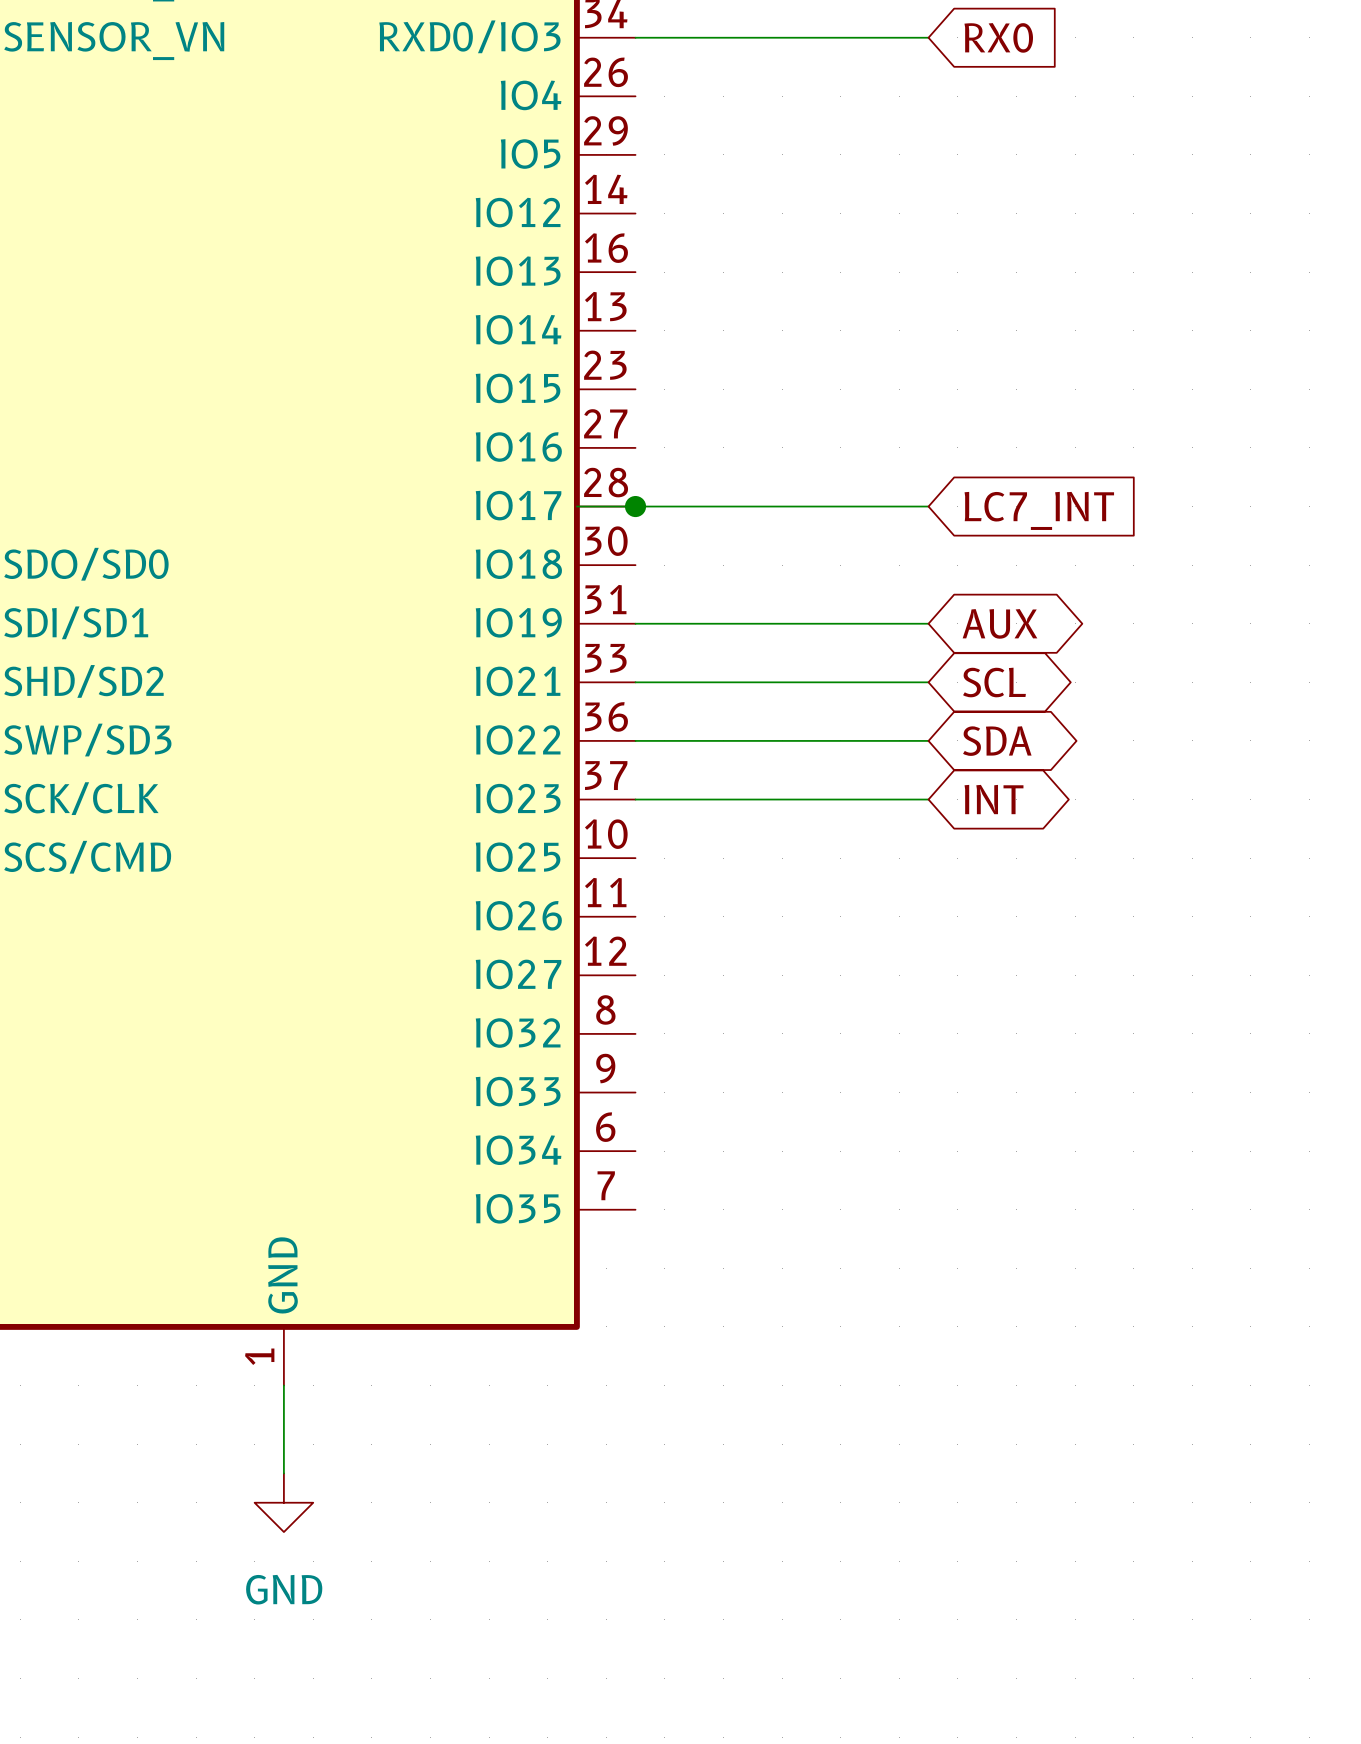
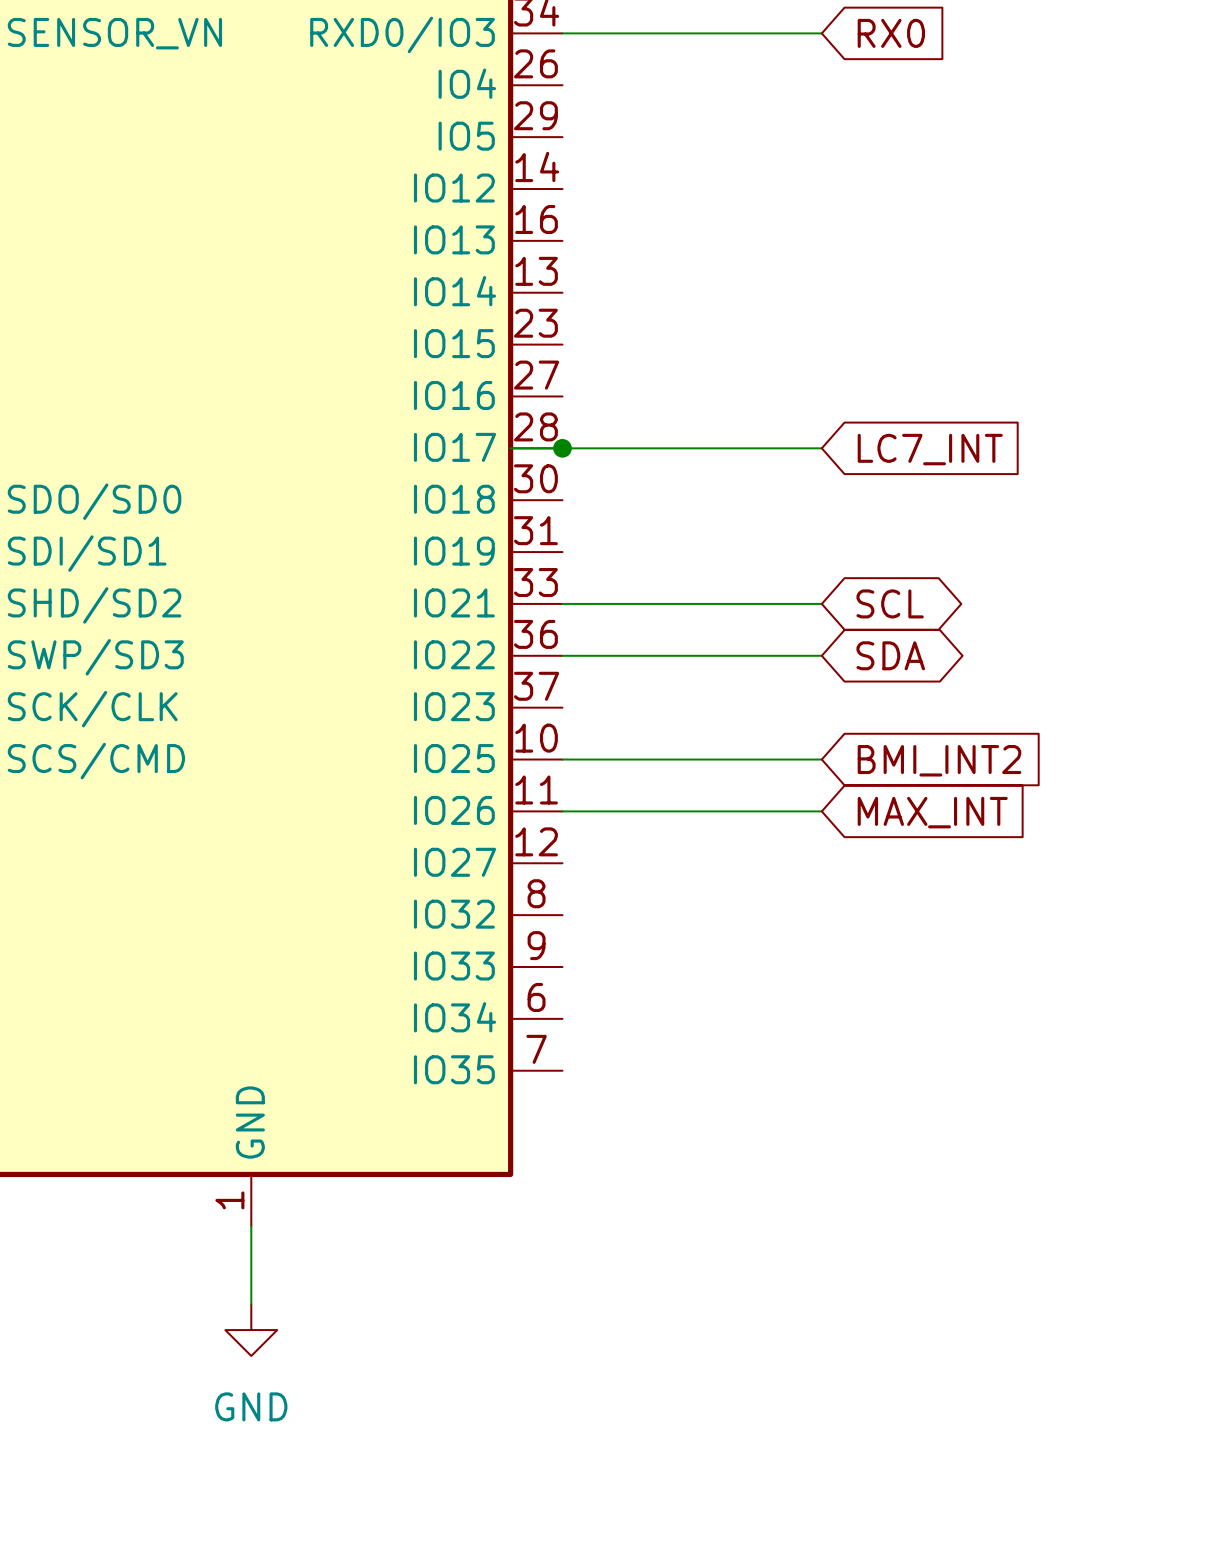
wire: (635, 623) (928, 623) -> (562, 811) (821, 811)
global label: AUX (1000, 623) -> none
wire: (635, 799) (928, 799) -> (562, 759) (821, 759)
global label: INT (994, 799) -> none
global label: none -> BMI_INT2 (939, 760)
global label: none -> MAX_INT (932, 812)

